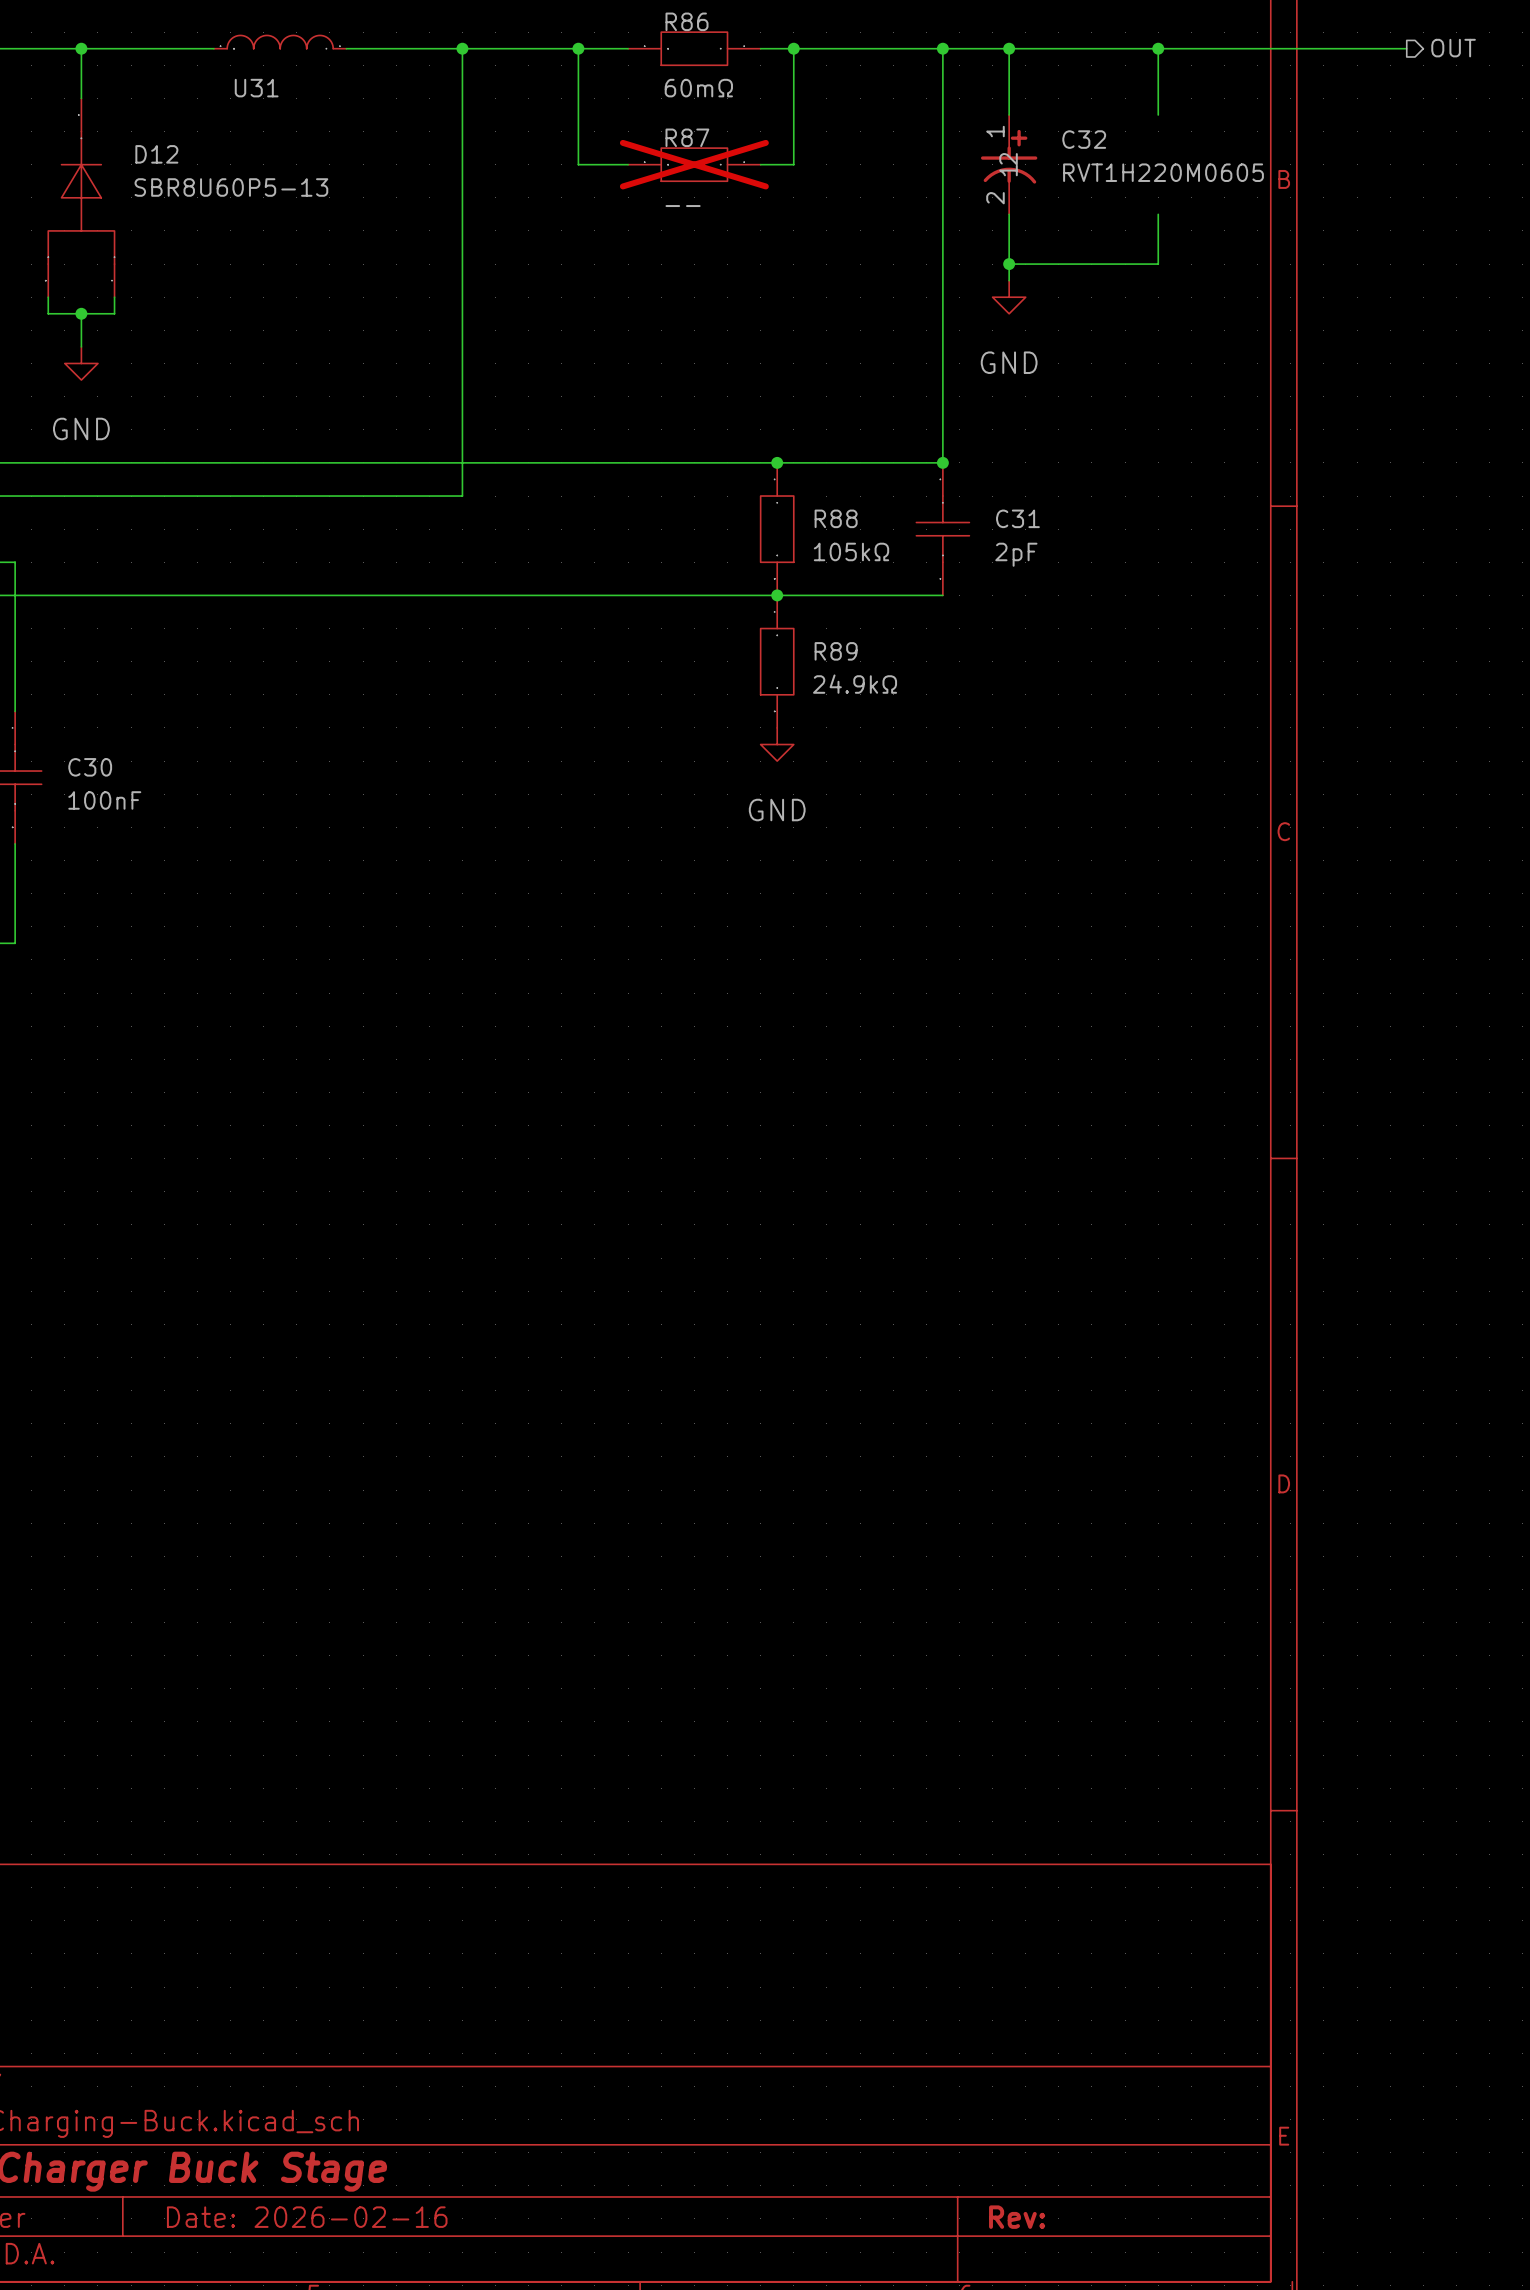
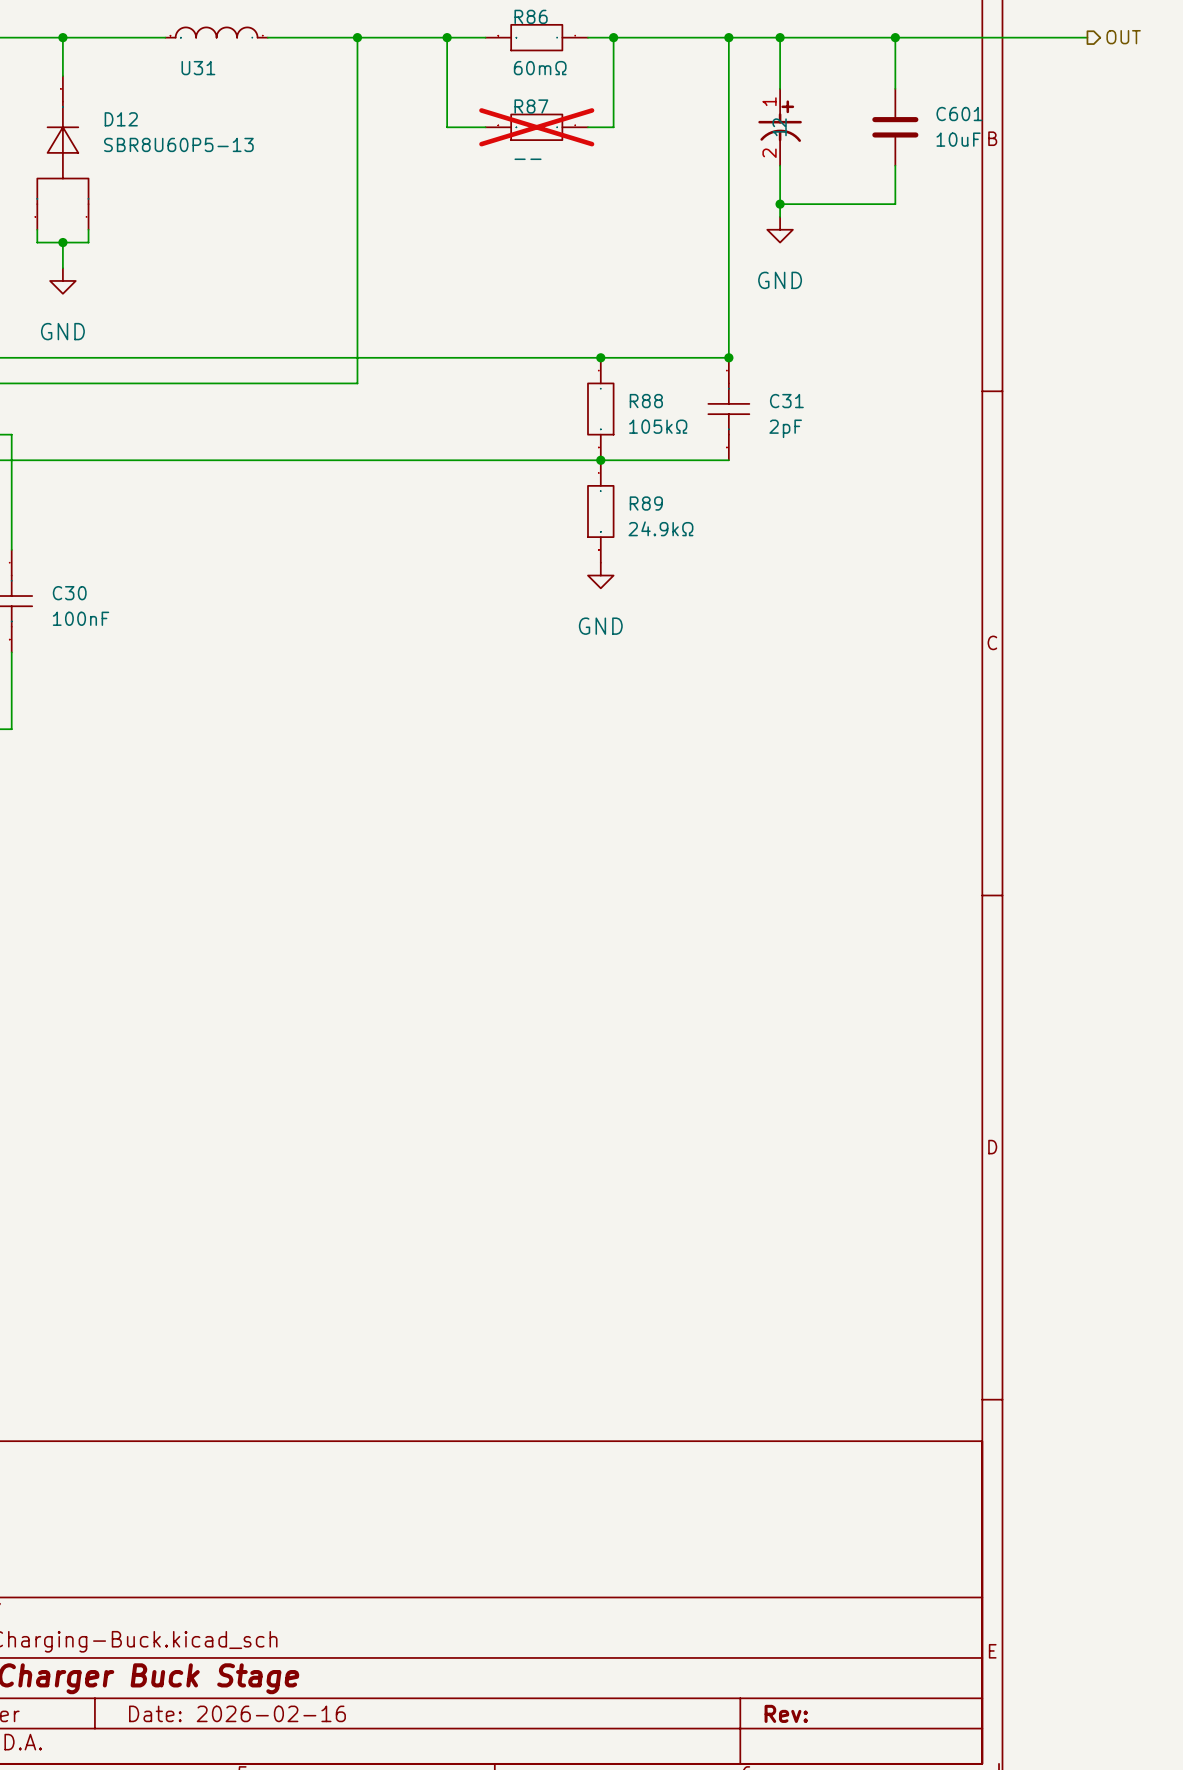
C32 name: C32 (1084, 139) -> none
C601: none -> 10uF (895, 127)
C32 value: RVT1H220M0605 (1163, 172) -> none

